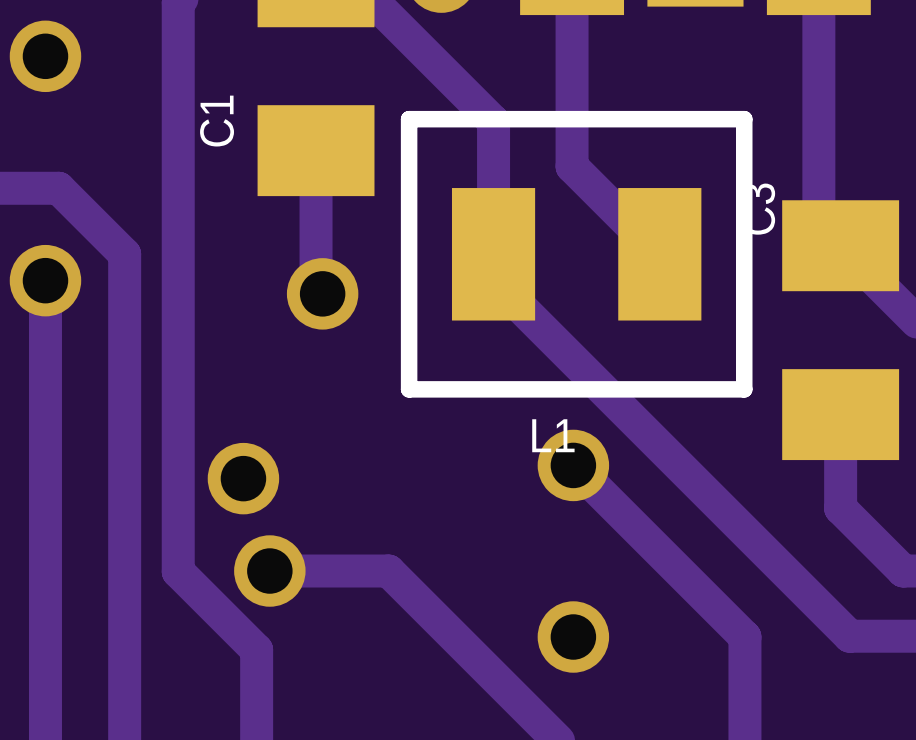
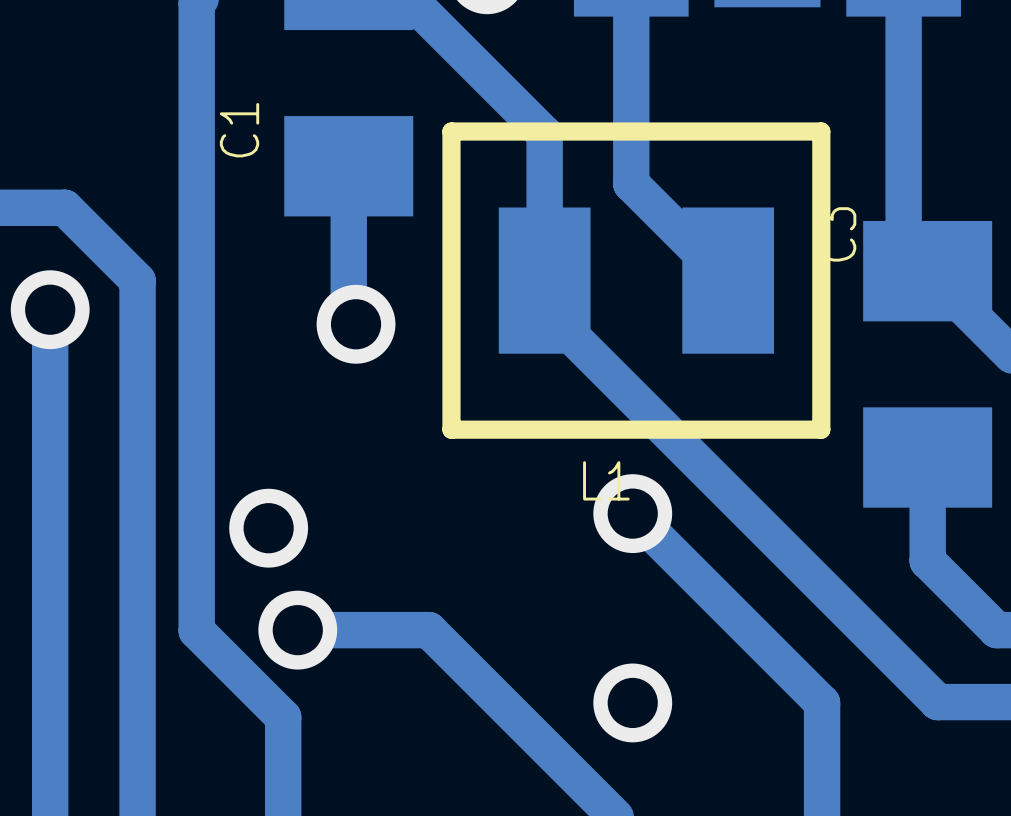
via: (45, 56) -> none

